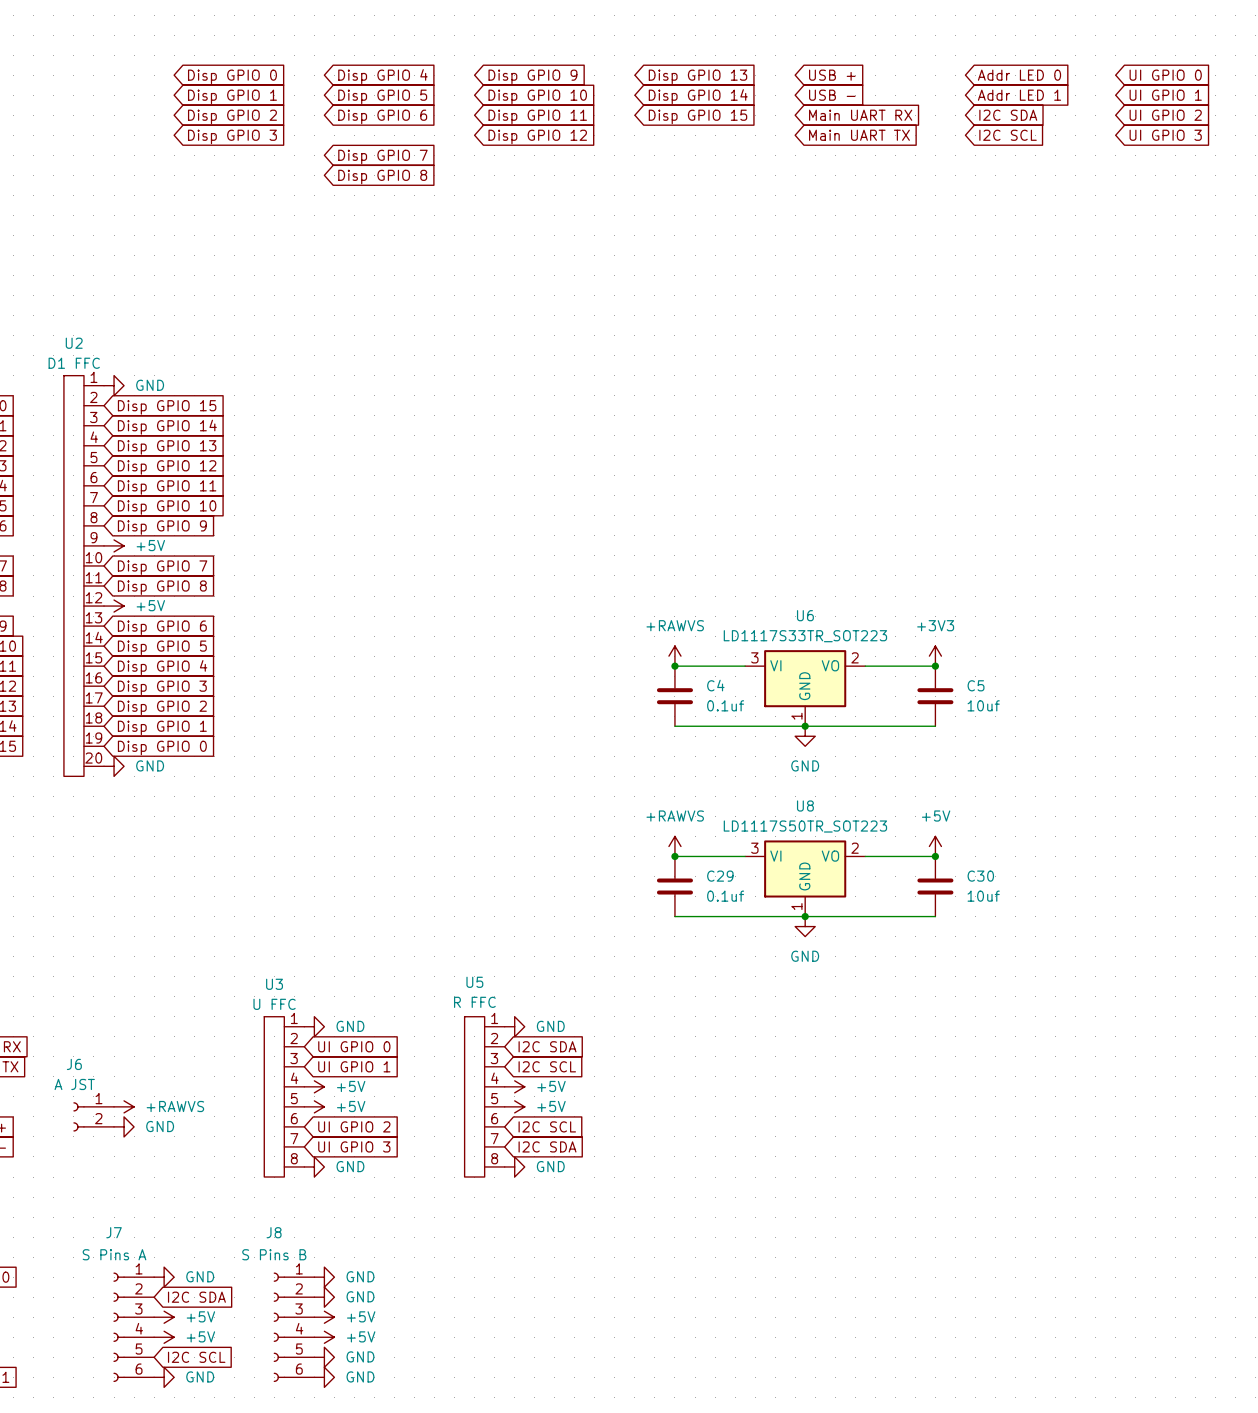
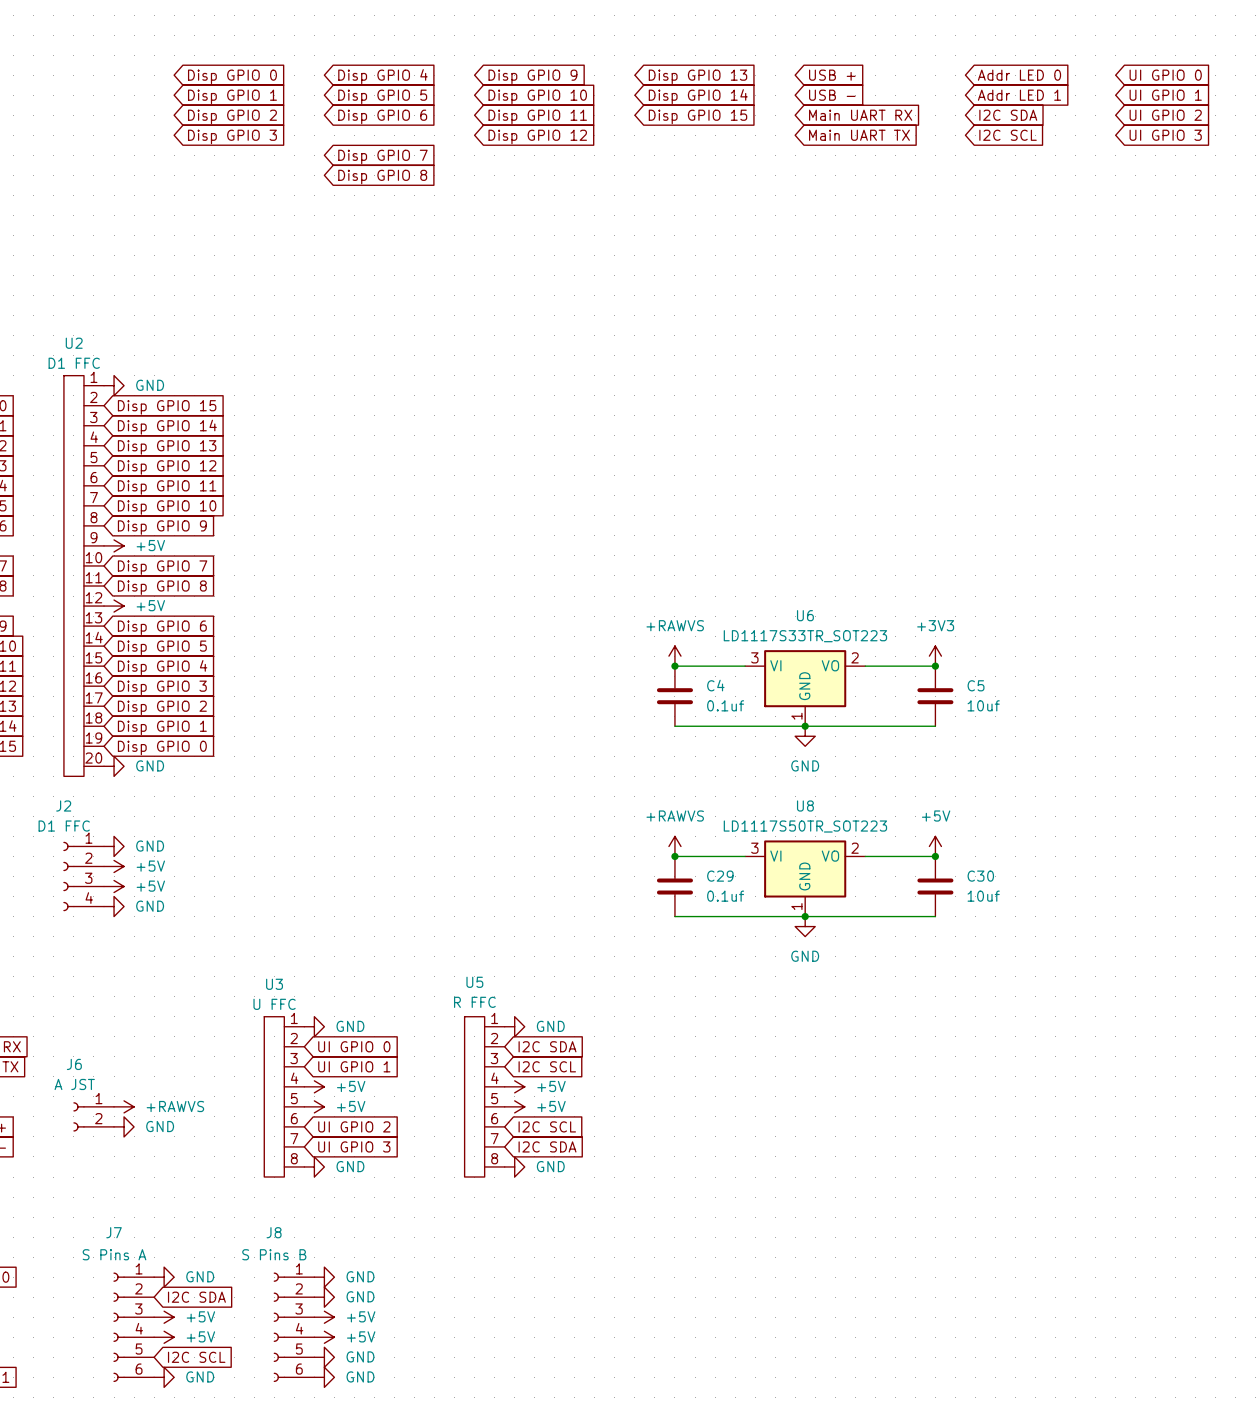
power symbol: none -> GND (114, 846)
power symbol: none -> +5V (114, 866)
J2: none -> D1 FFC (83, 876)
power symbol: none -> +5V (114, 886)
power symbol: none -> GND (114, 906)

